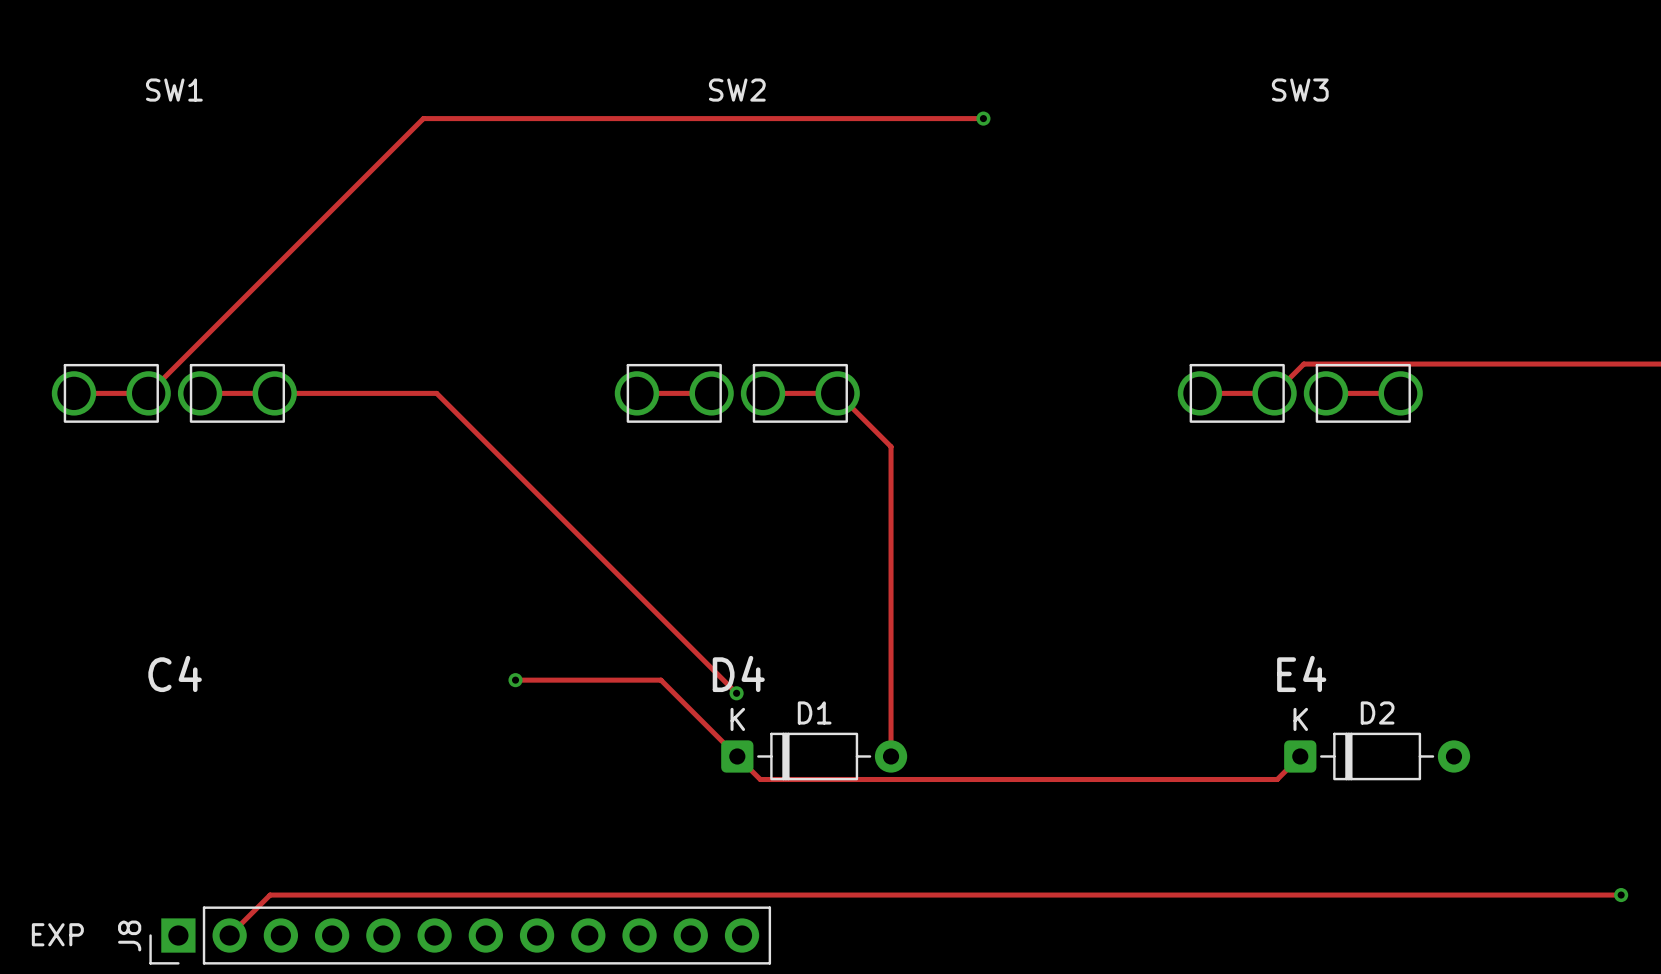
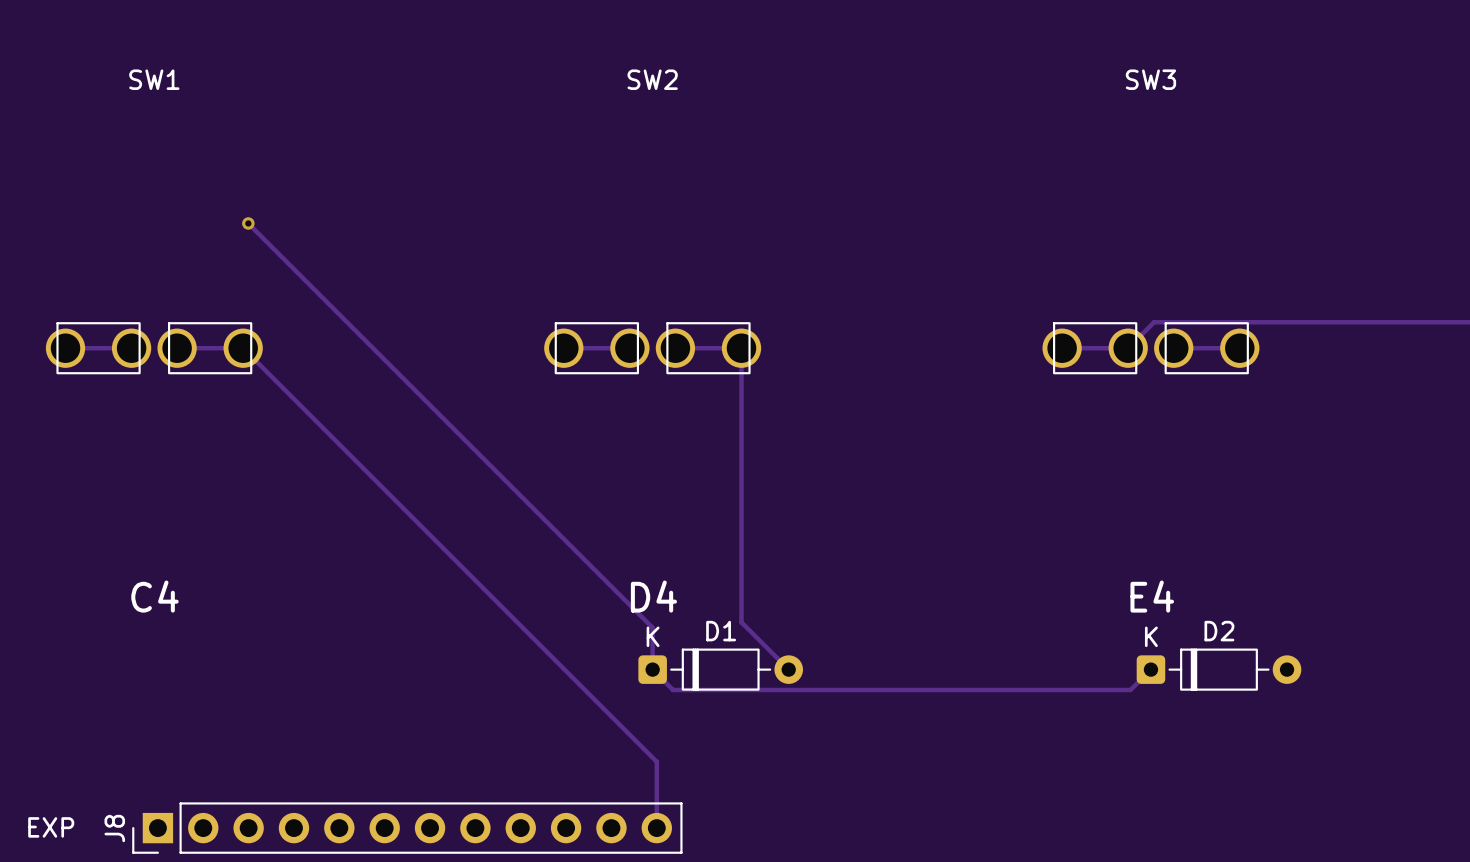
track: (983, 118) (423, 118) (148, 393) -> none
via: (983, 118) -> none
via: none -> (248, 223)
track: (274, 393) (436, 393) (736, 693) -> (243, 348) (656, 761) (656, 828)
track: (837, 393) (891, 446) (891, 756) -> (741, 348) (741, 622) (788, 669)
track: (515, 680) (660, 680) (737, 756) -> (248, 223) (652, 627) (652, 669)
via: (515, 680) -> none
via: (736, 693) -> none
track: (1621, 895) (270, 895) (229, 935) -> none
via: (1621, 895) -> none

